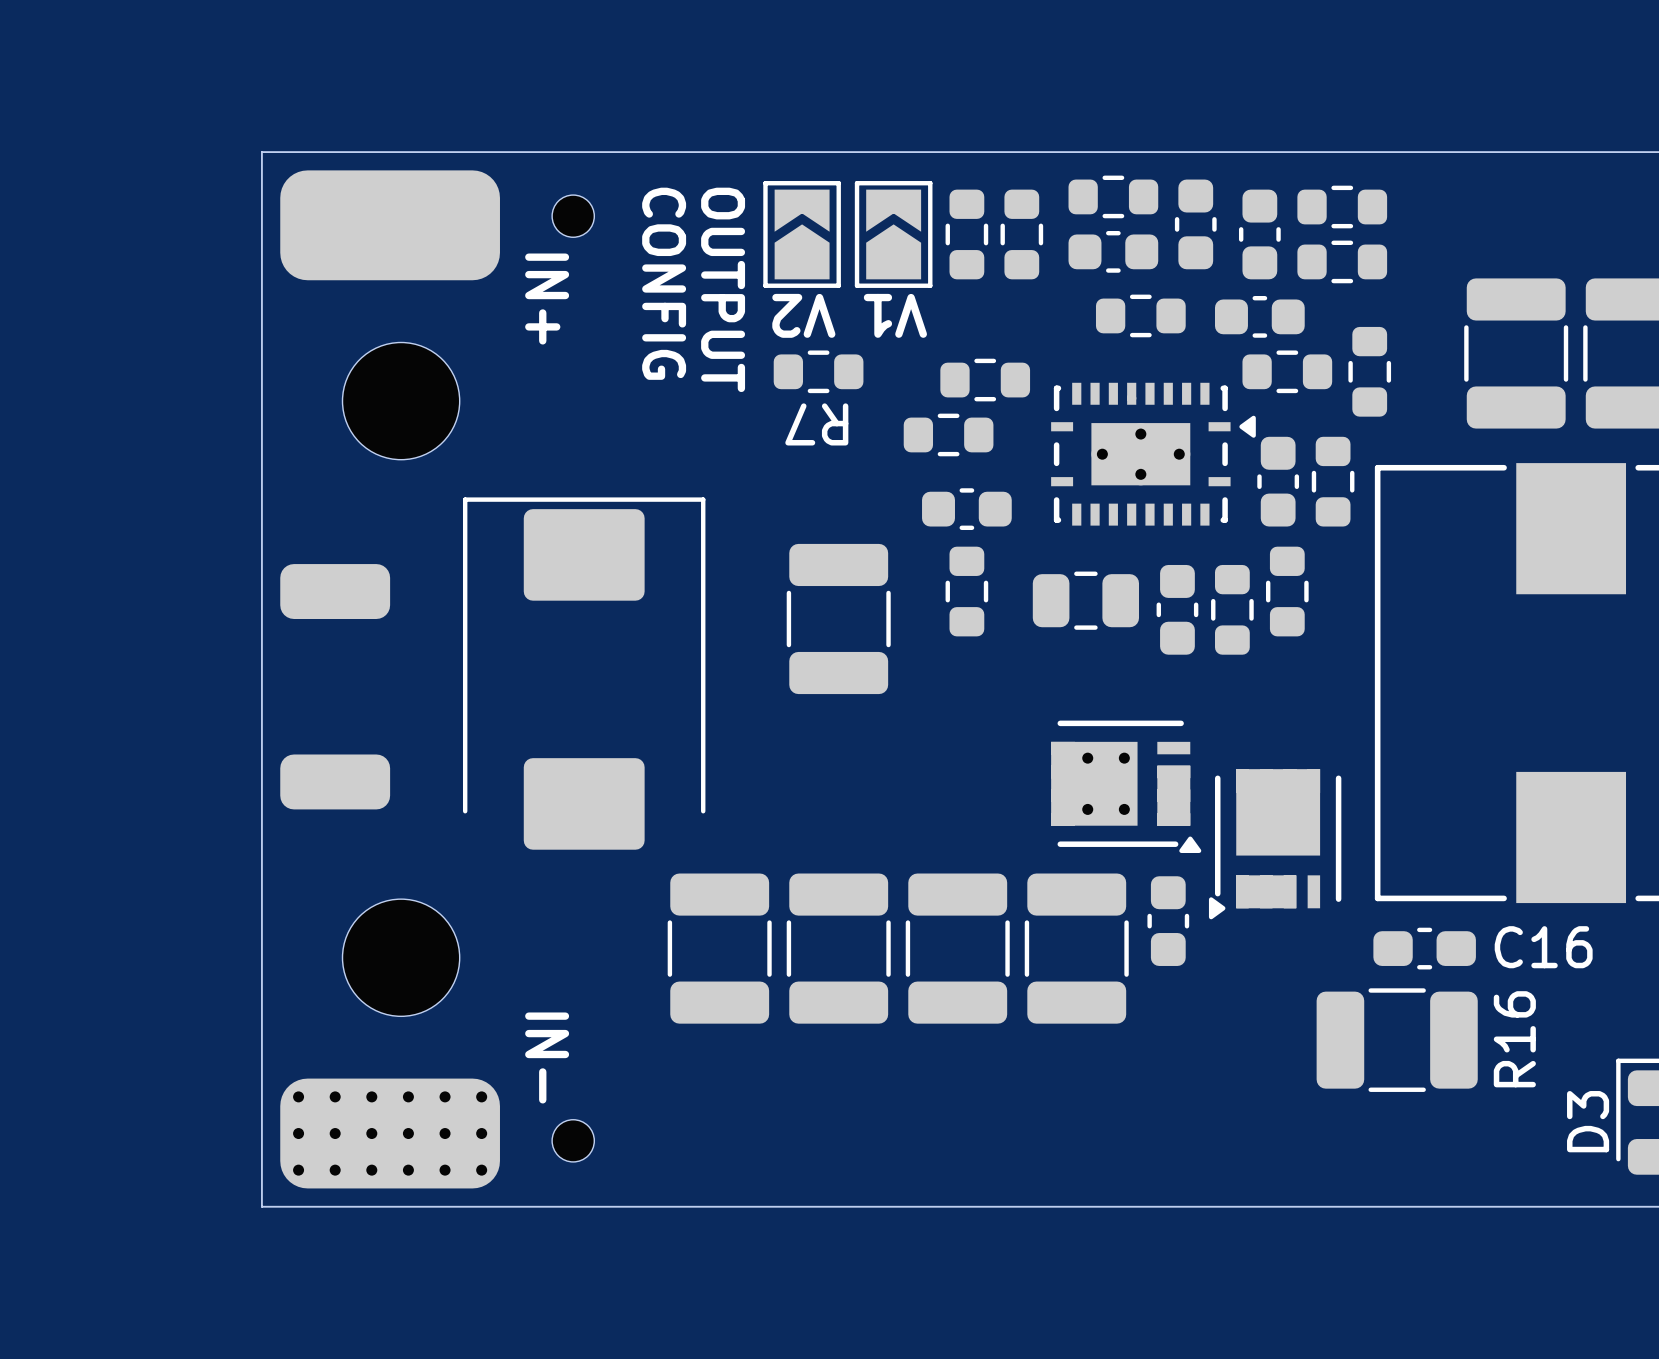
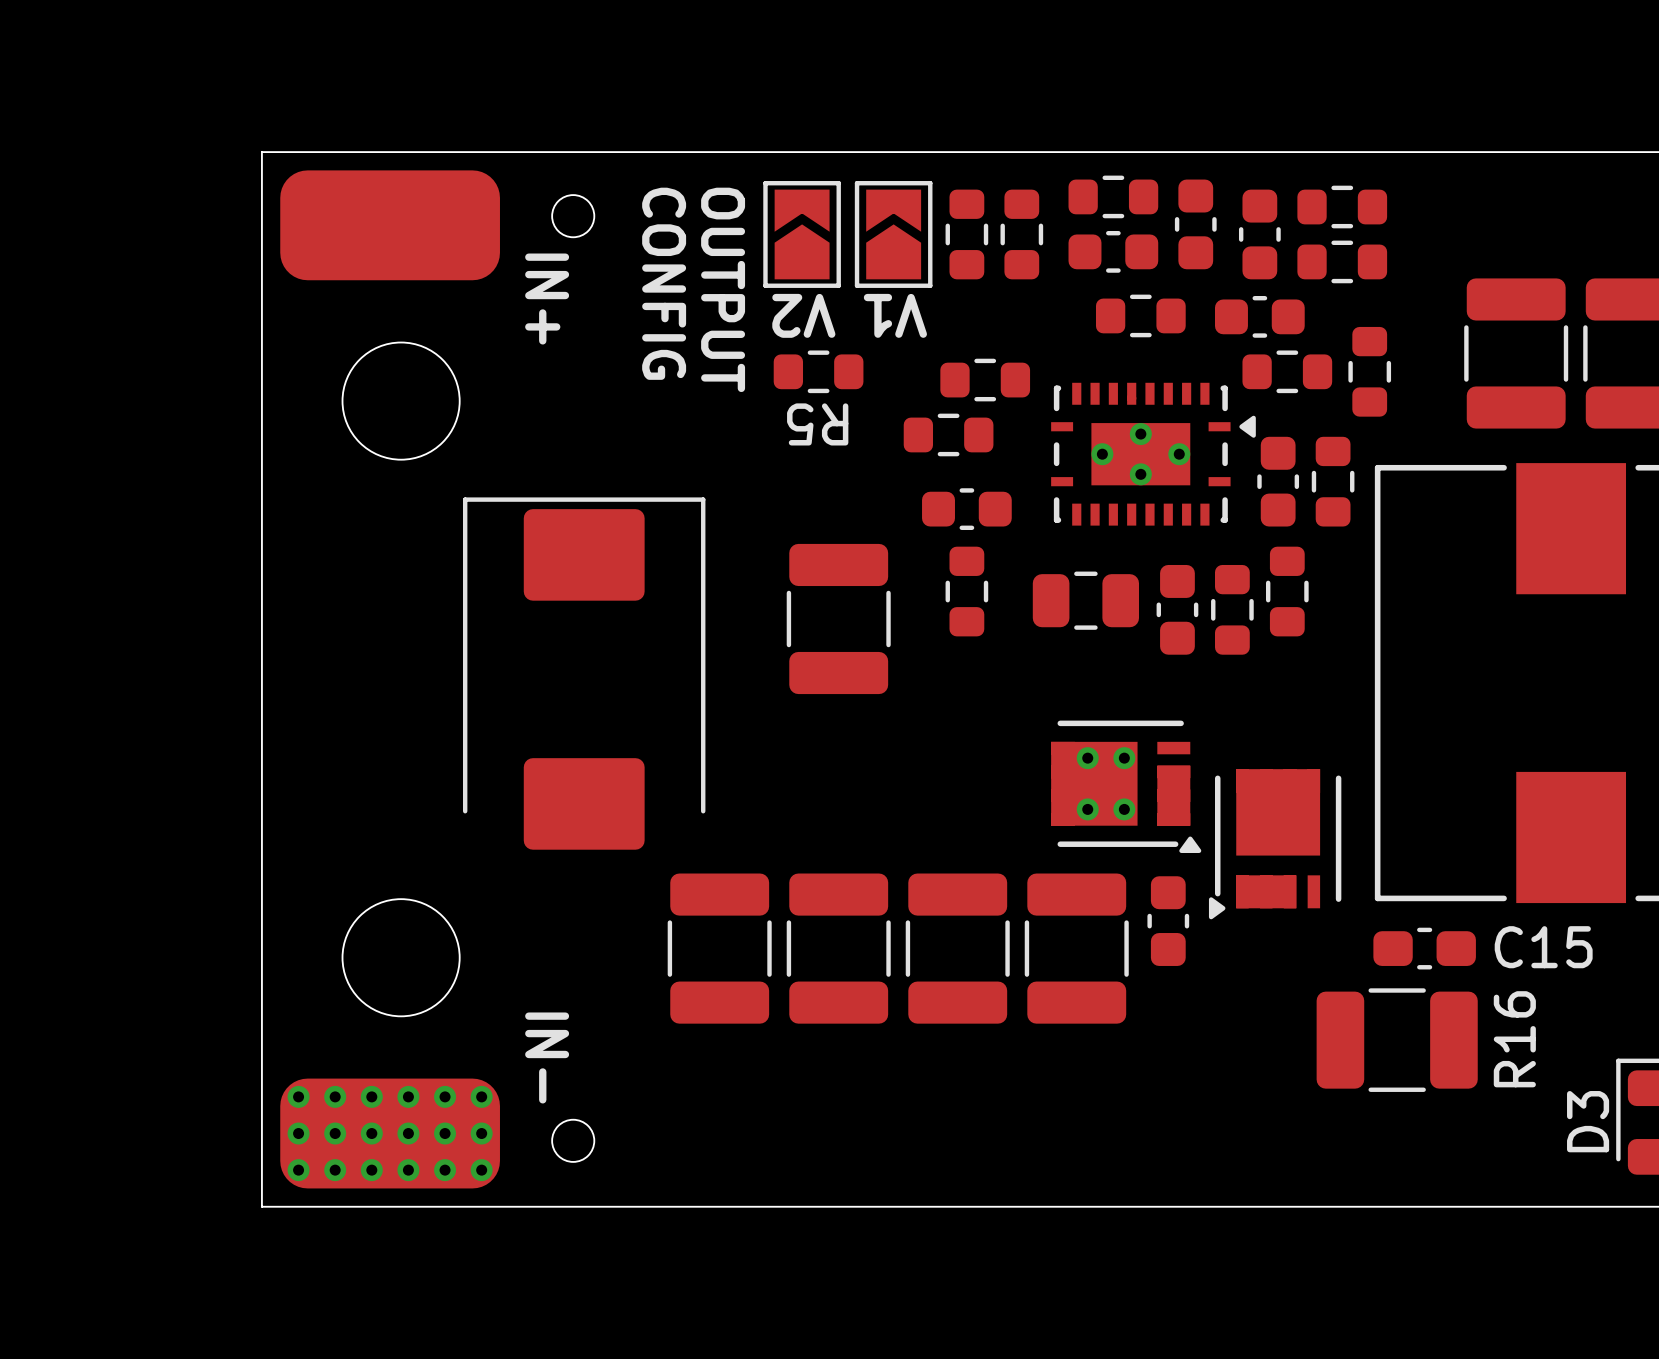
R7 name: R7 (816, 424) -> R5 (817, 424)
part: (335, 591) -> none
part: (335, 781) -> none
C16 name: C16 (1543, 947) -> C15 (1543, 947)

